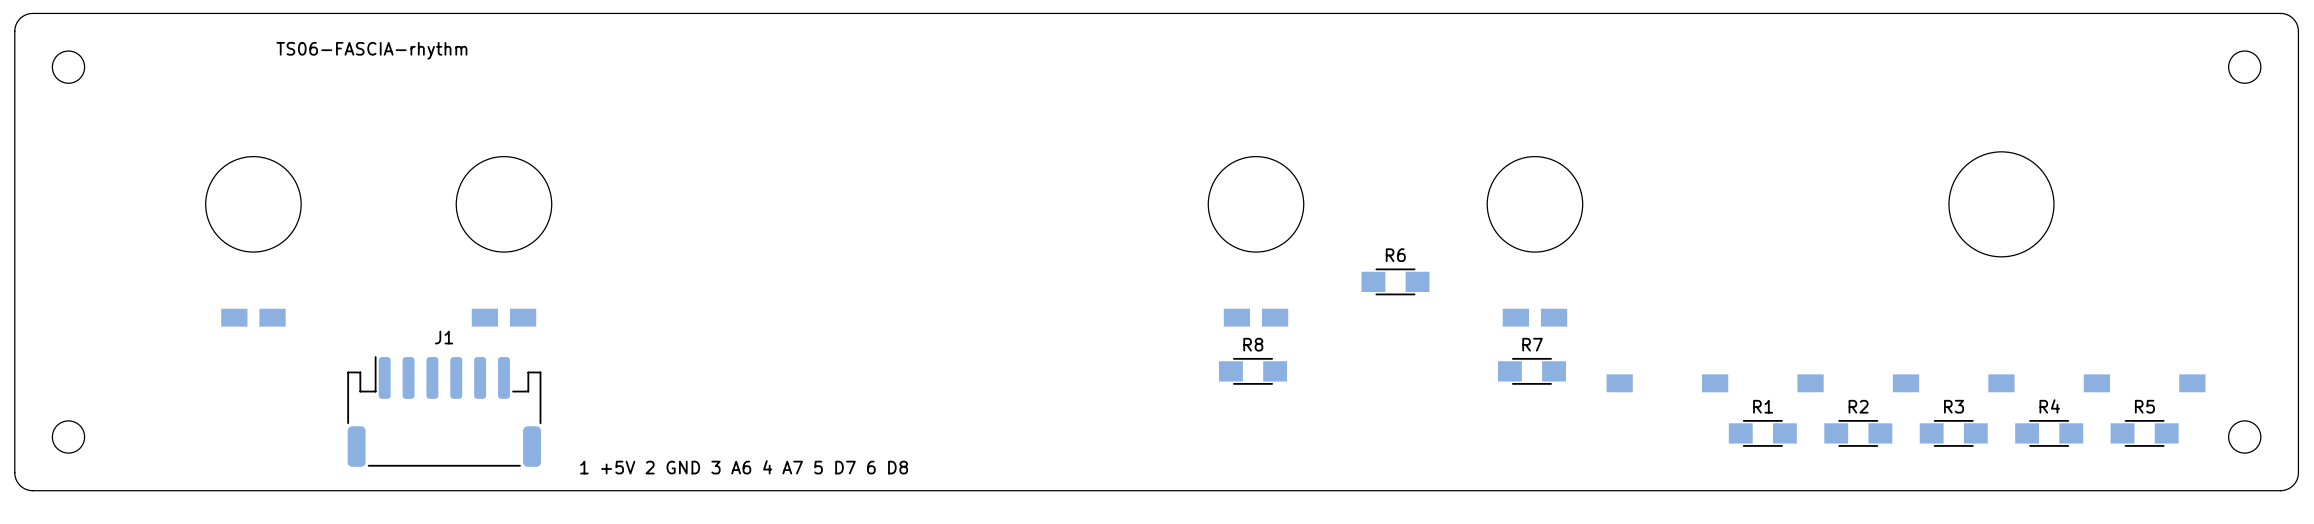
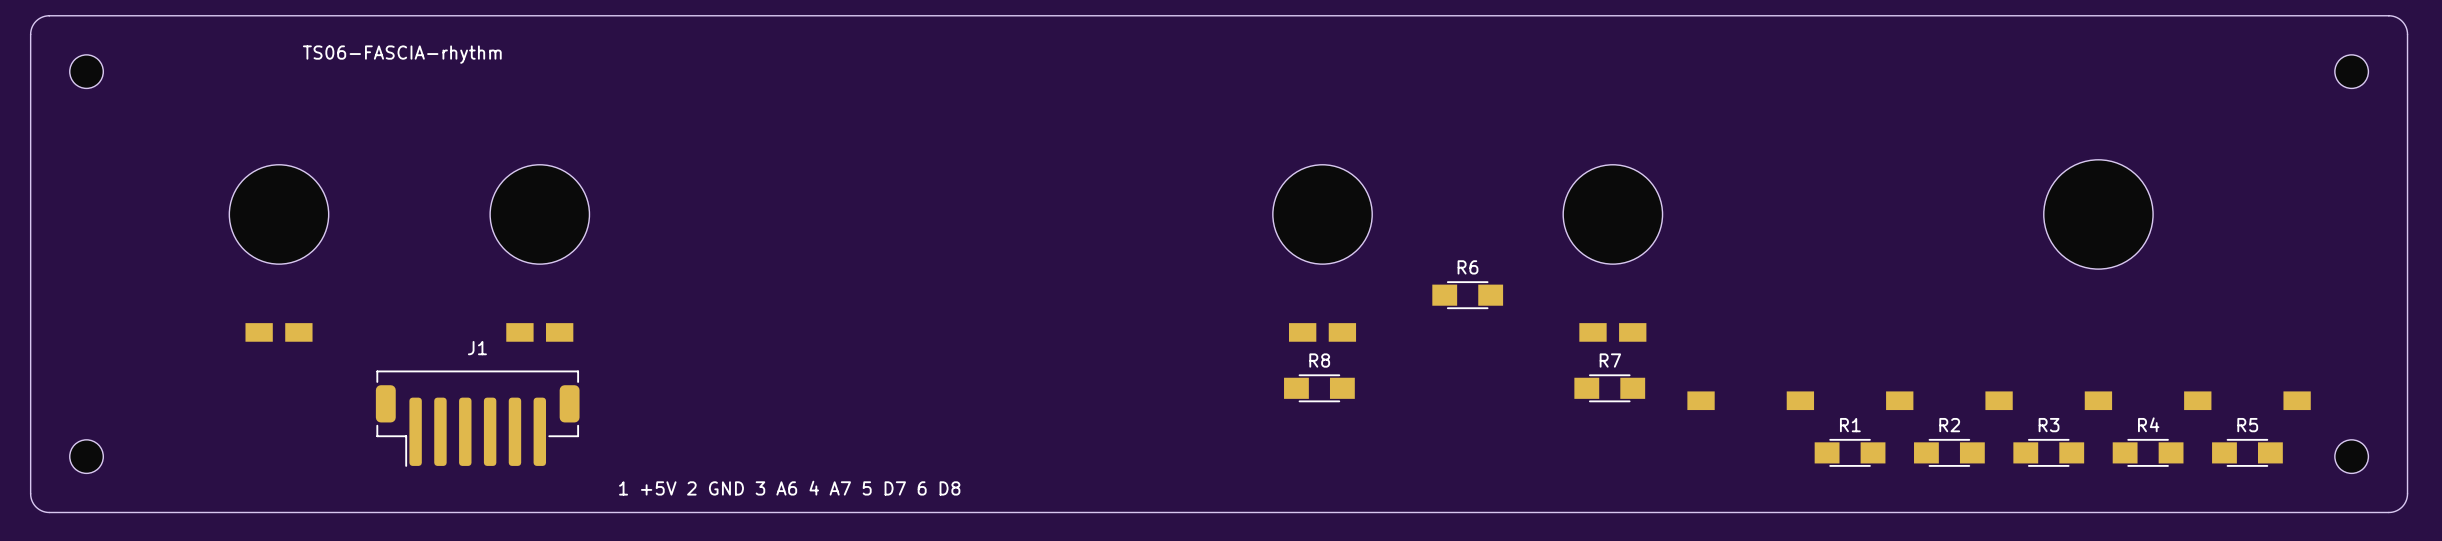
J1 footprint: [347, 356, 542, 467] -> [375, 370, 580, 467]

